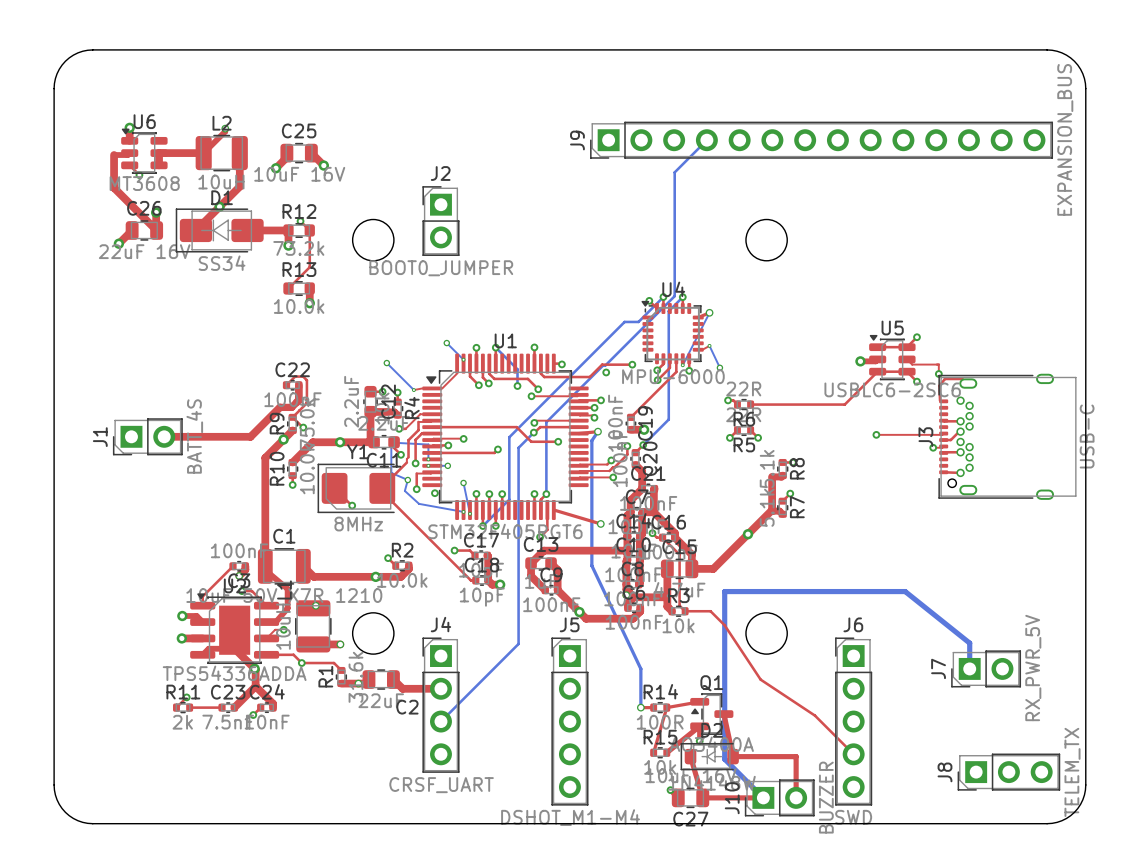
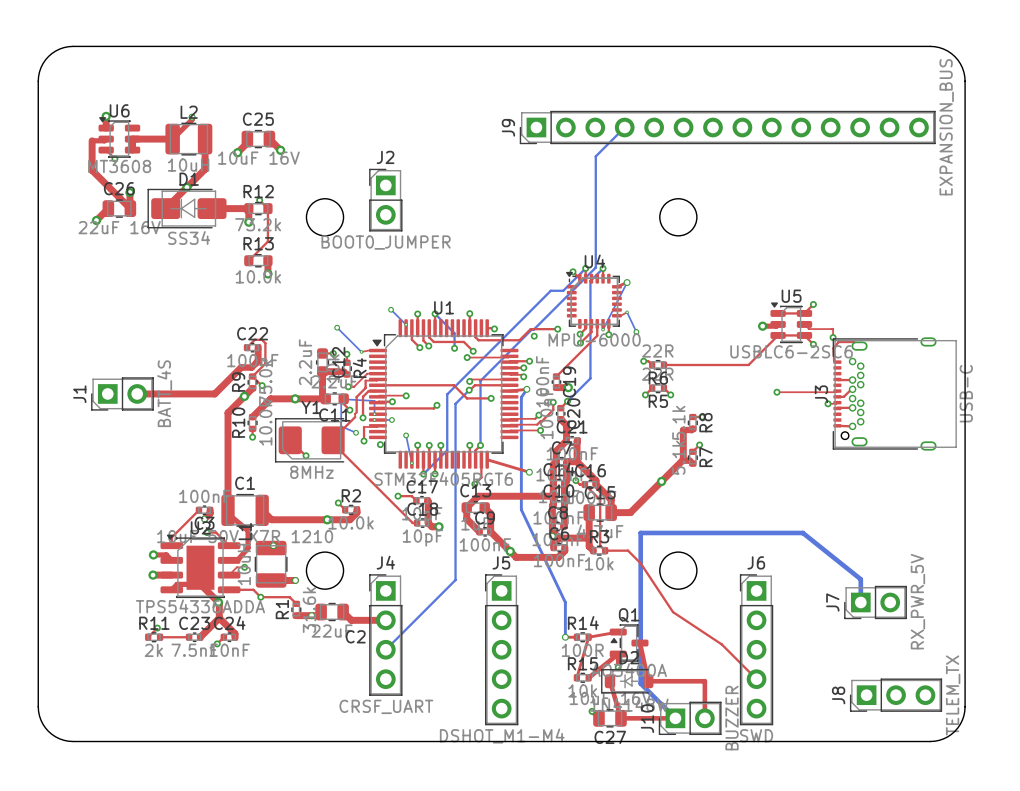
top track: (457, 373) (442, 388) -> none
bottom track: (407, 480) (404, 490) (419, 503) (463, 511) -> none
via: (463, 511) -> none

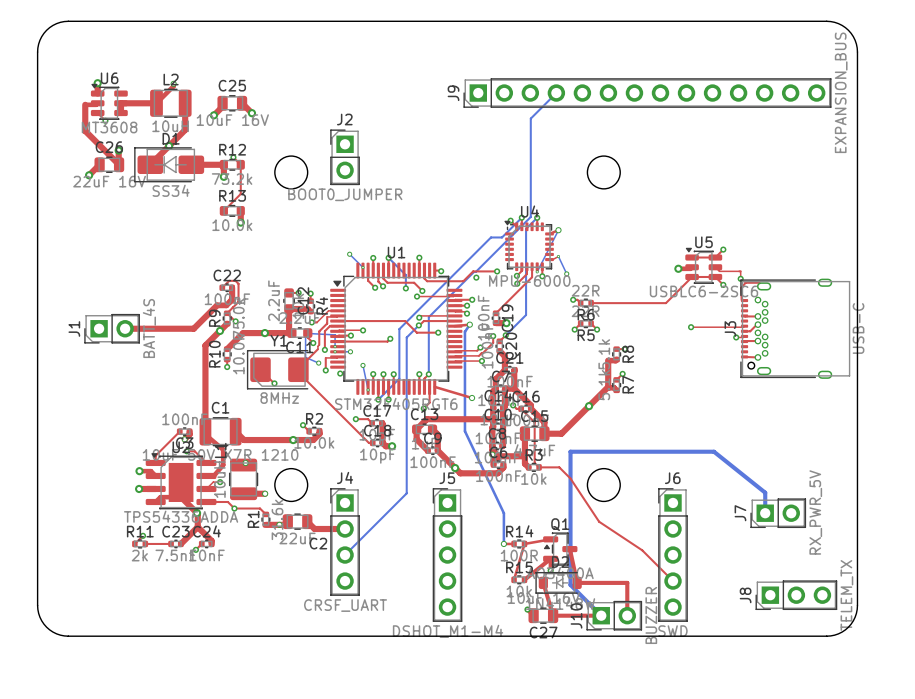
bottom track: (337, 327) (361, 351) -> none
via: (337, 327) -> none
top track: (369, 350) (361, 351) -> none
via: (361, 351) -> none

